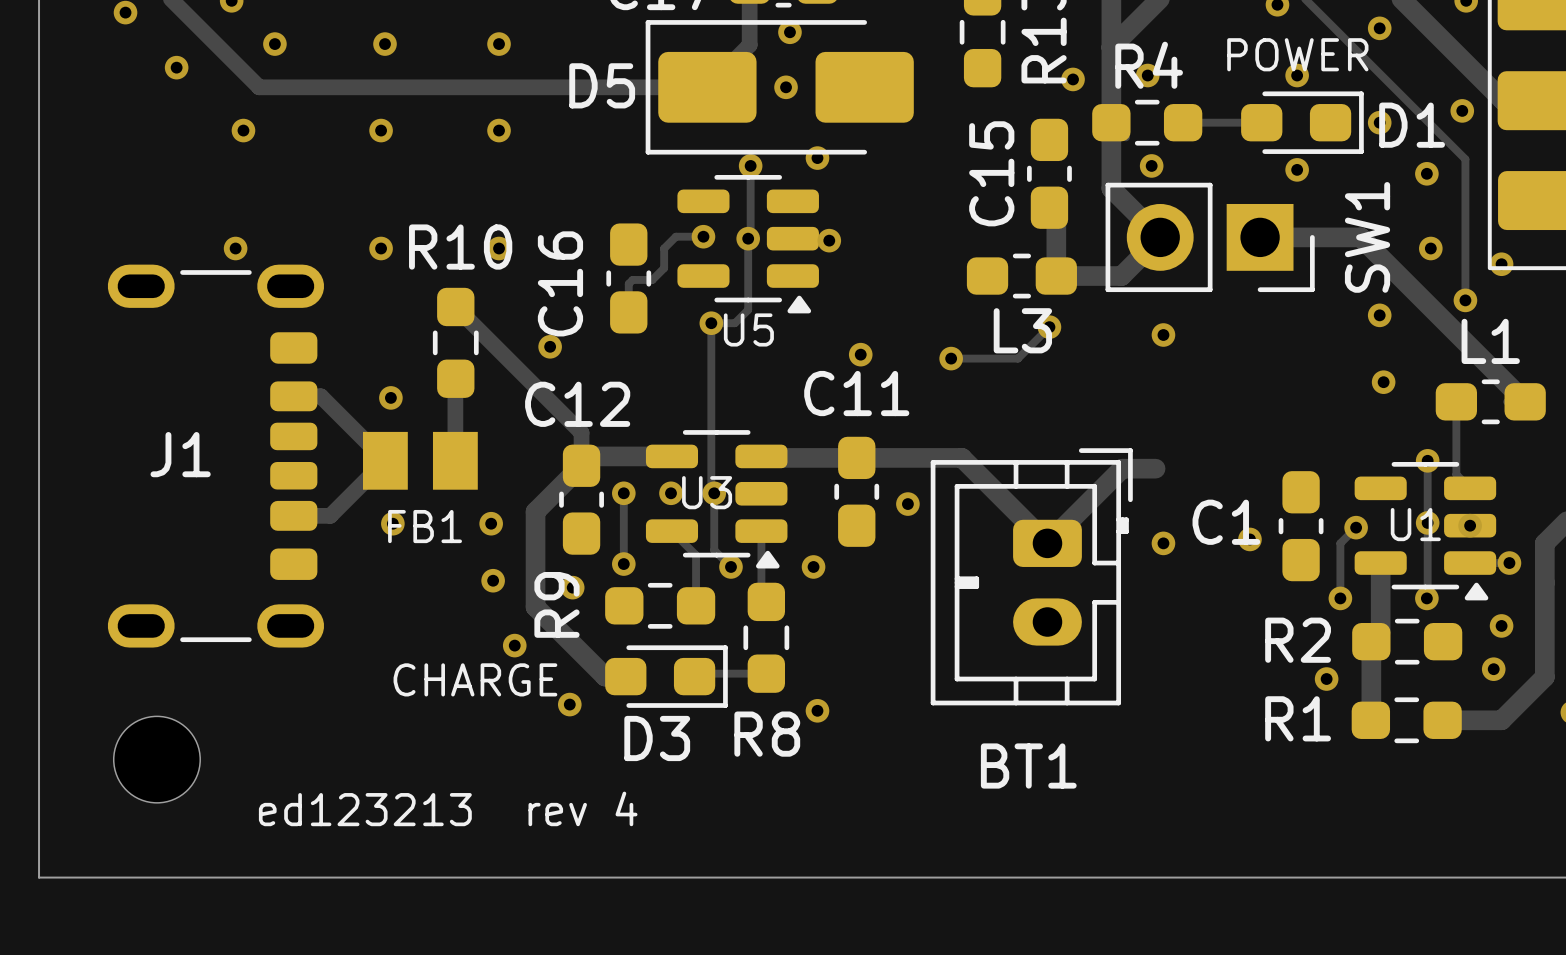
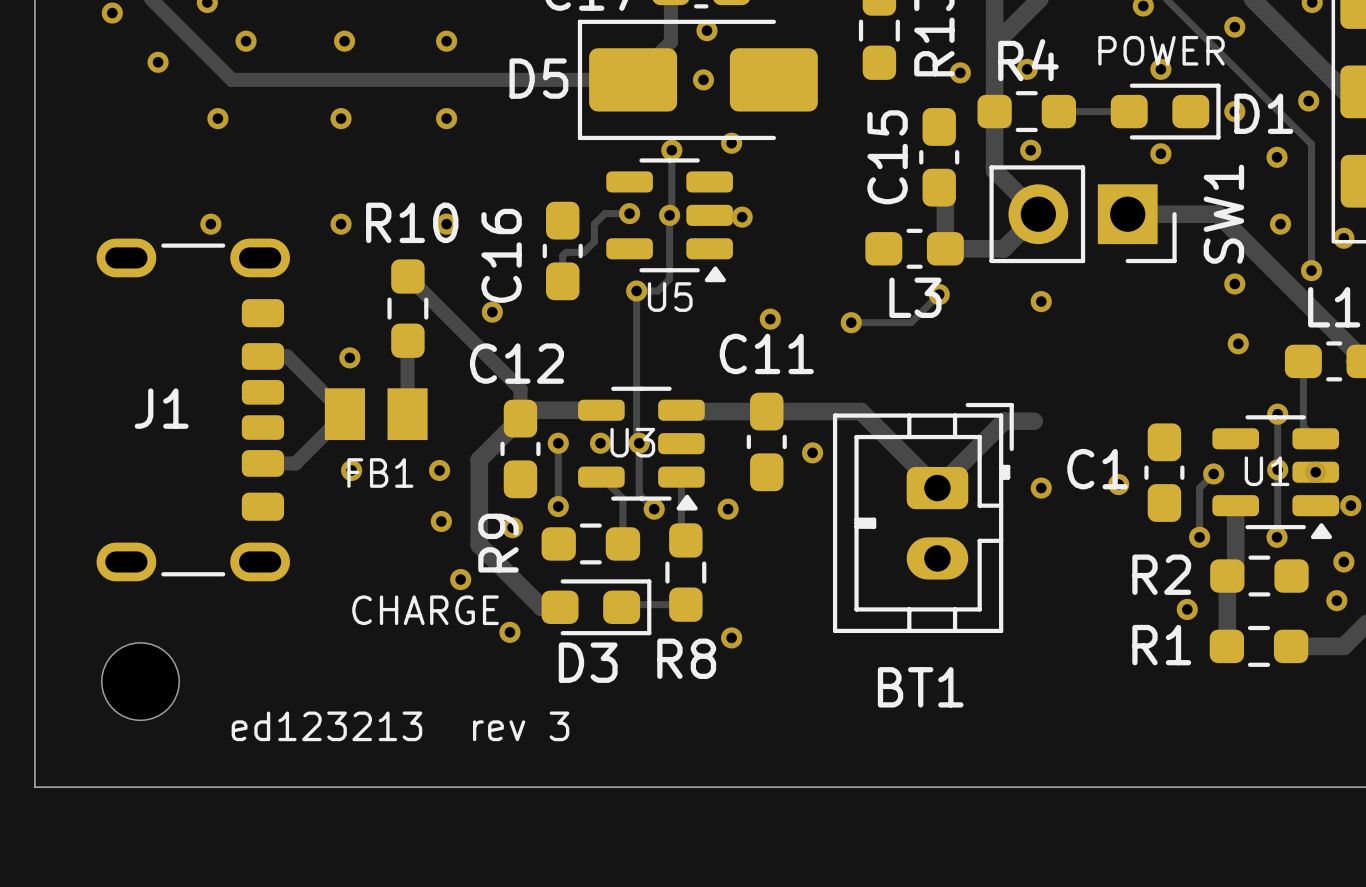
text: rev 4 (582, 808) -> rev 3 (521, 726)

